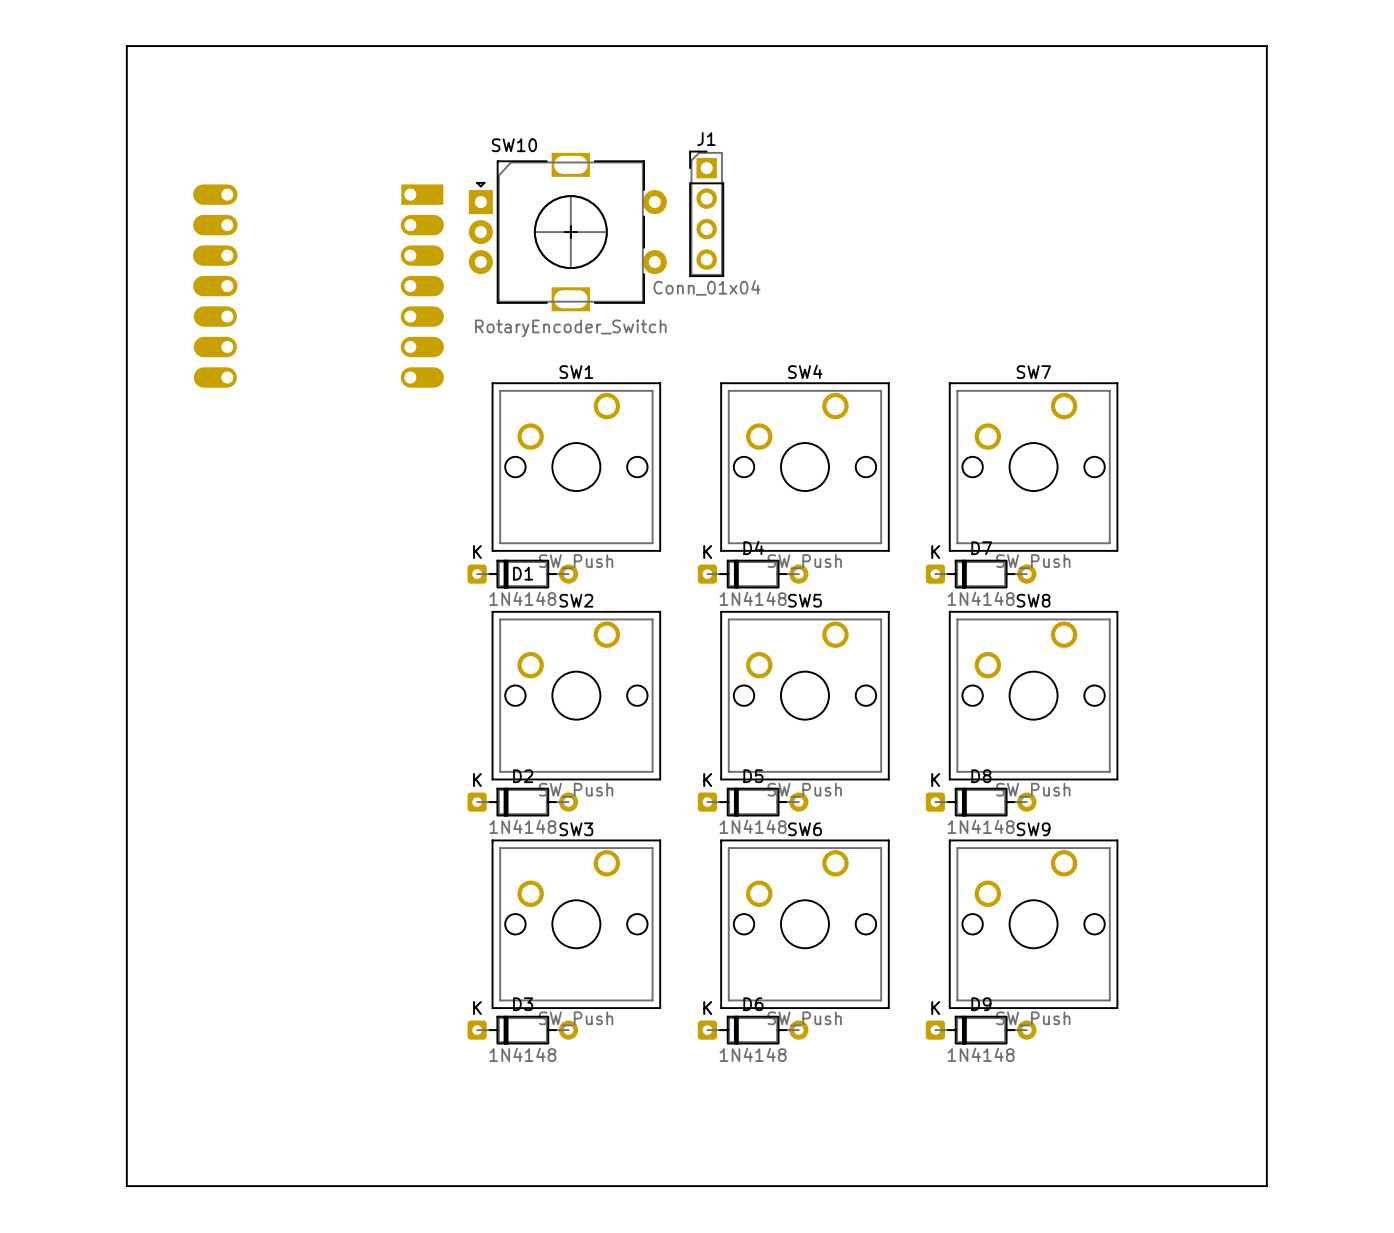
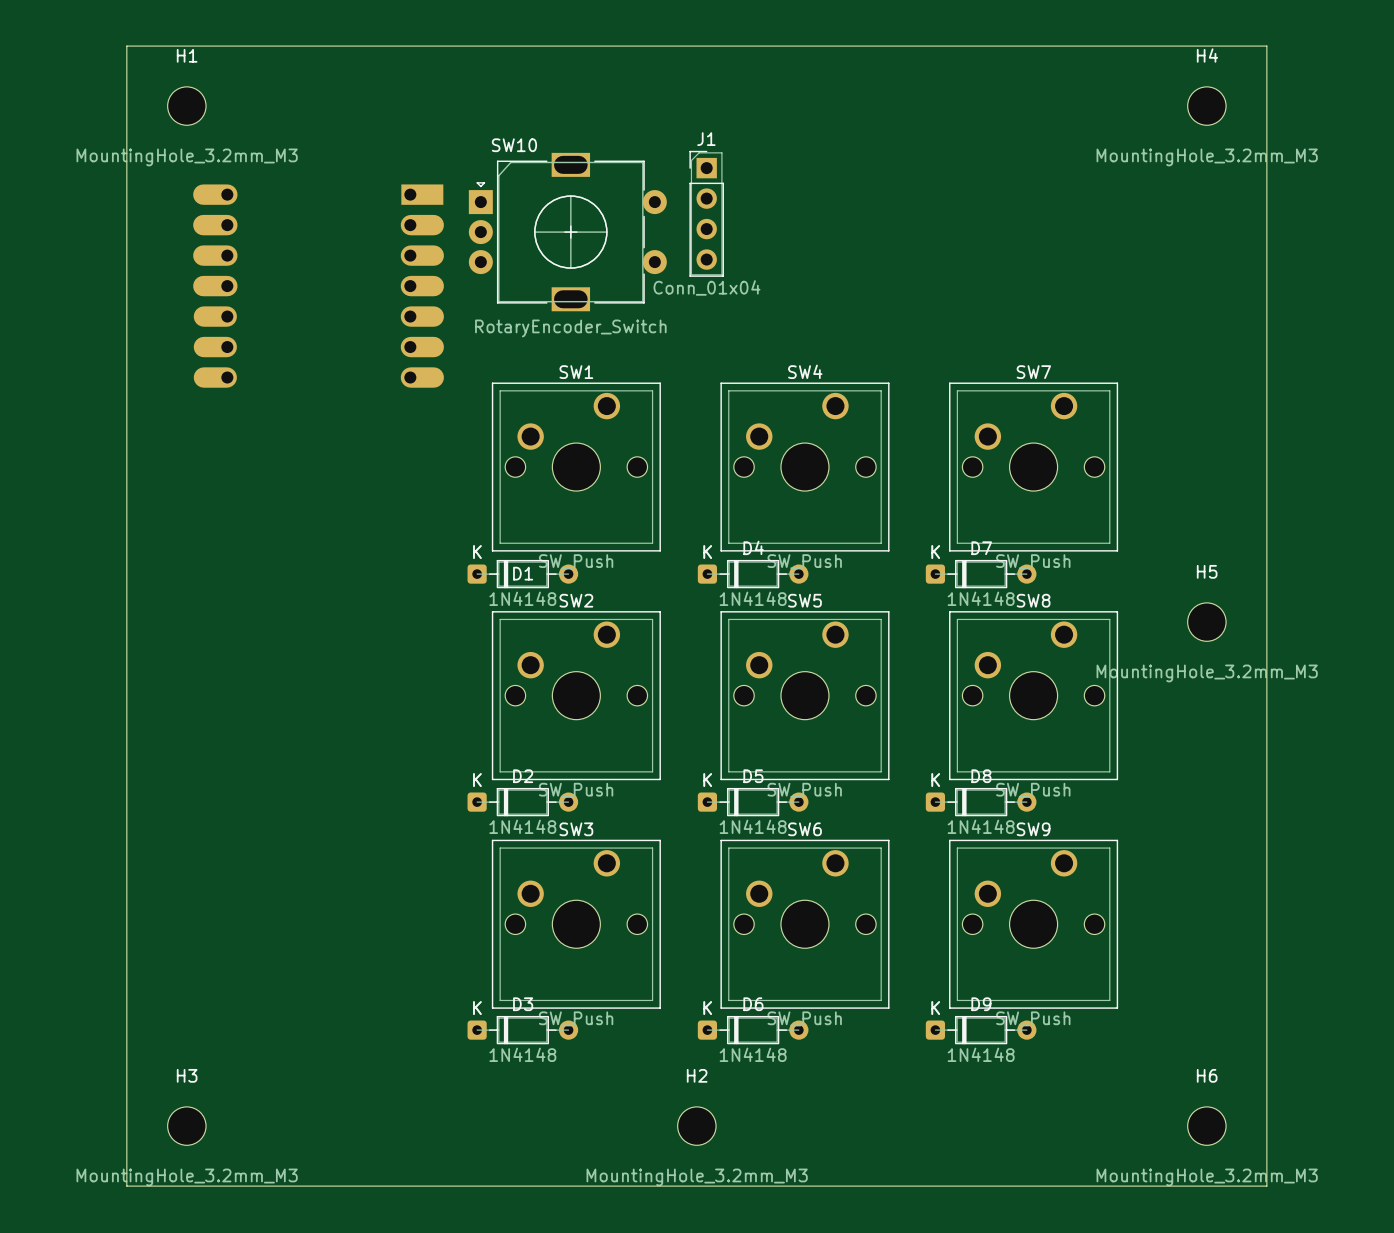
H1: none -> MountingHole_3.2mm_M3 (186, 106)
H4: none -> MountingHole_3.2mm_M3 (1206, 106)
H5: none -> MountingHole_3.2mm_M3 (1206, 622)
H3: none -> MountingHole_3.2mm_M3 (186, 1126)
H2: none -> MountingHole_3.2mm_M3 (696, 1126)
H6: none -> MountingHole_3.2mm_M3 (1206, 1126)

